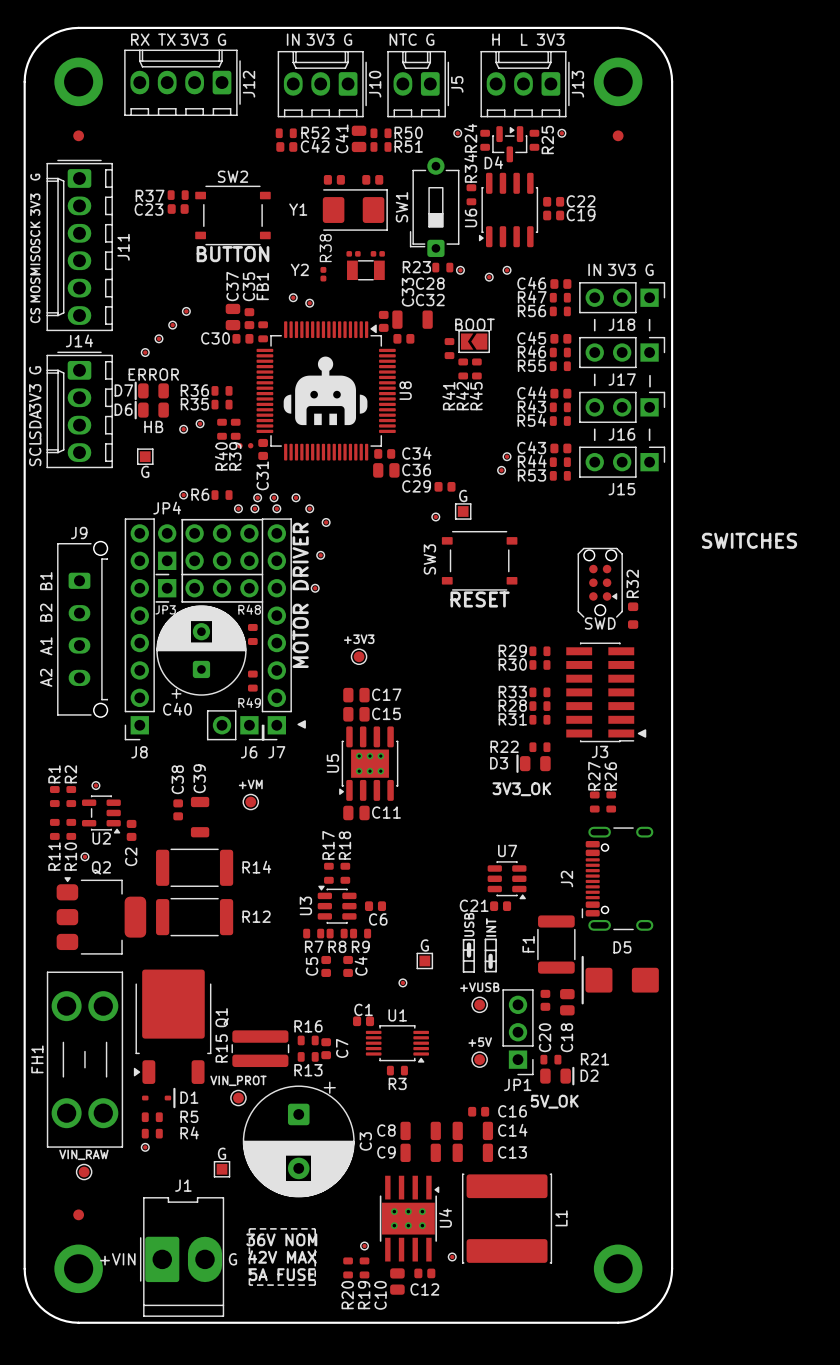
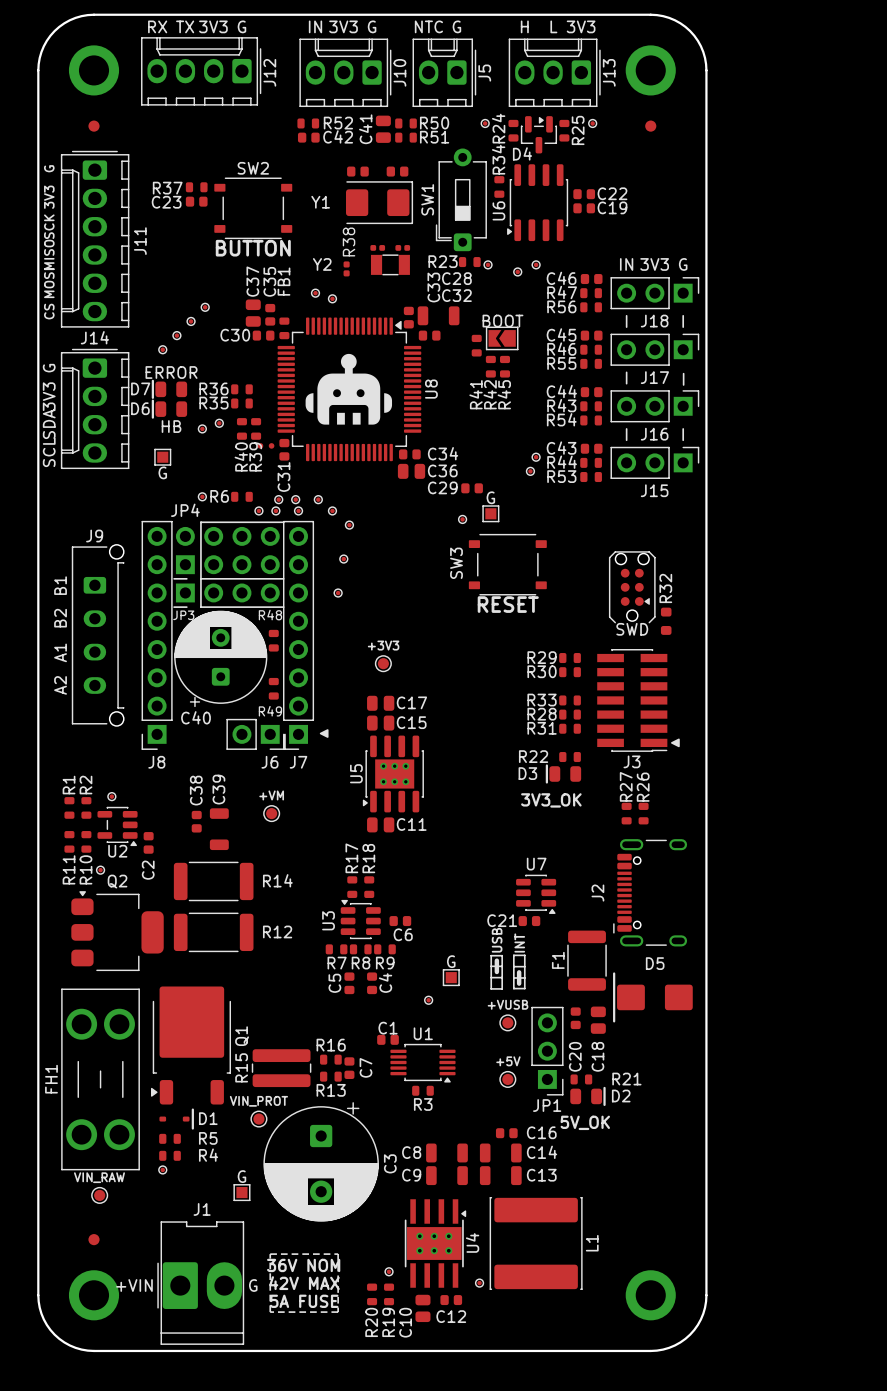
text: SWITCHES (749, 540) -> none
text: MOTOR DRIVER (300, 595) -> none

